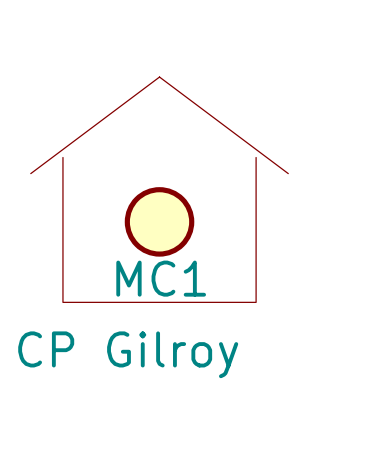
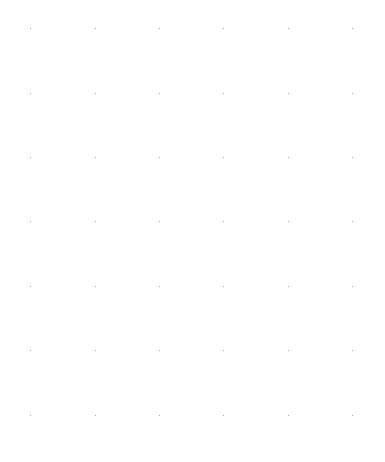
part: CP Gilroy (159, 189) -> none
MC1: (159, 221) -> none

